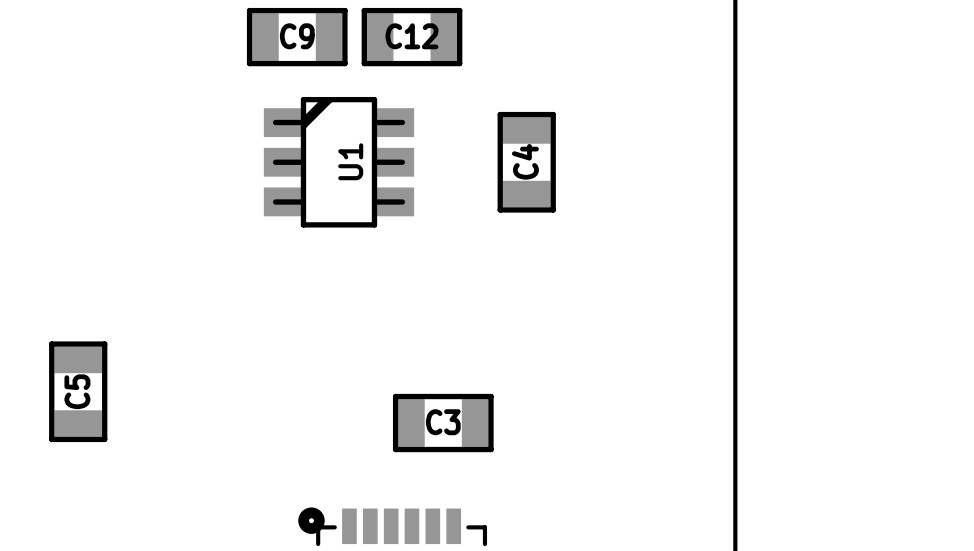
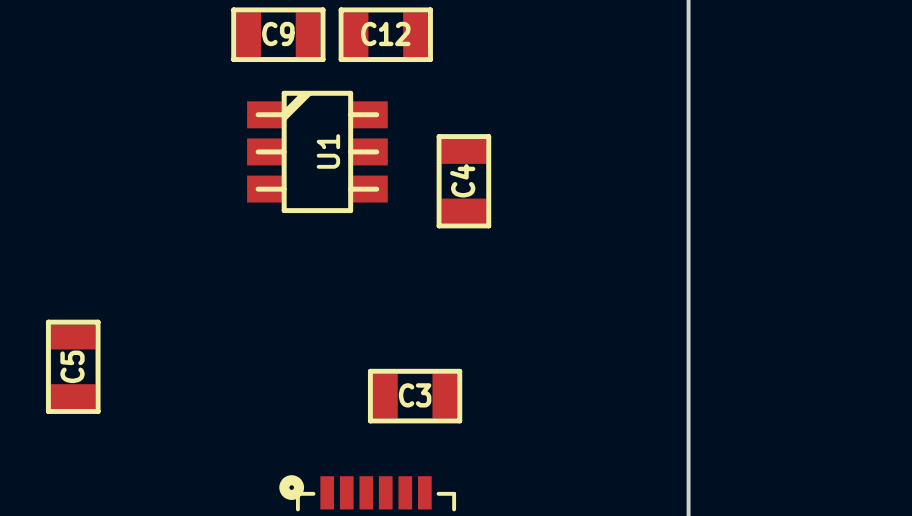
C4 position: (526, 162) -> (463, 181)

